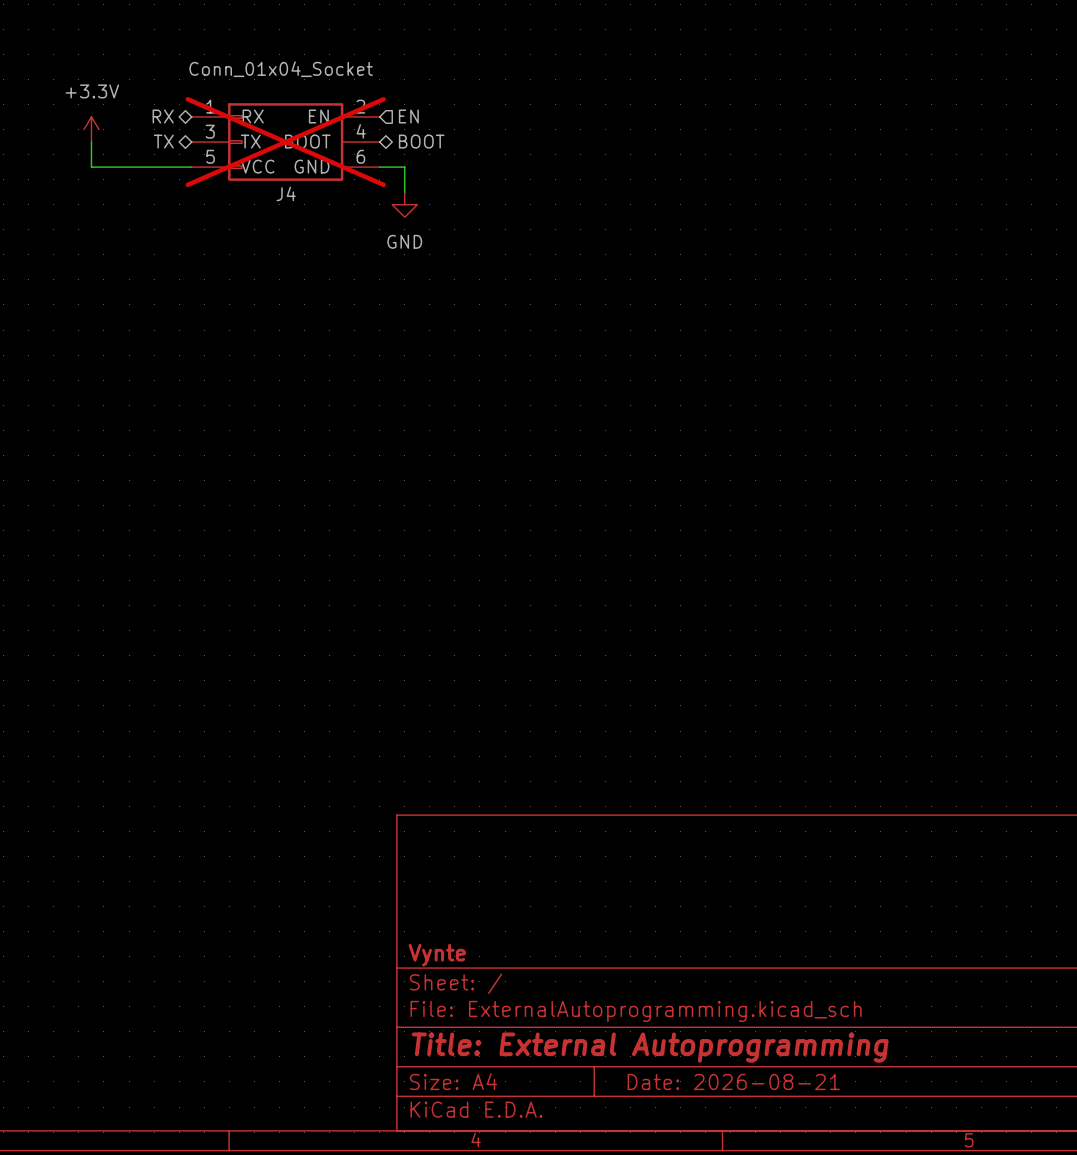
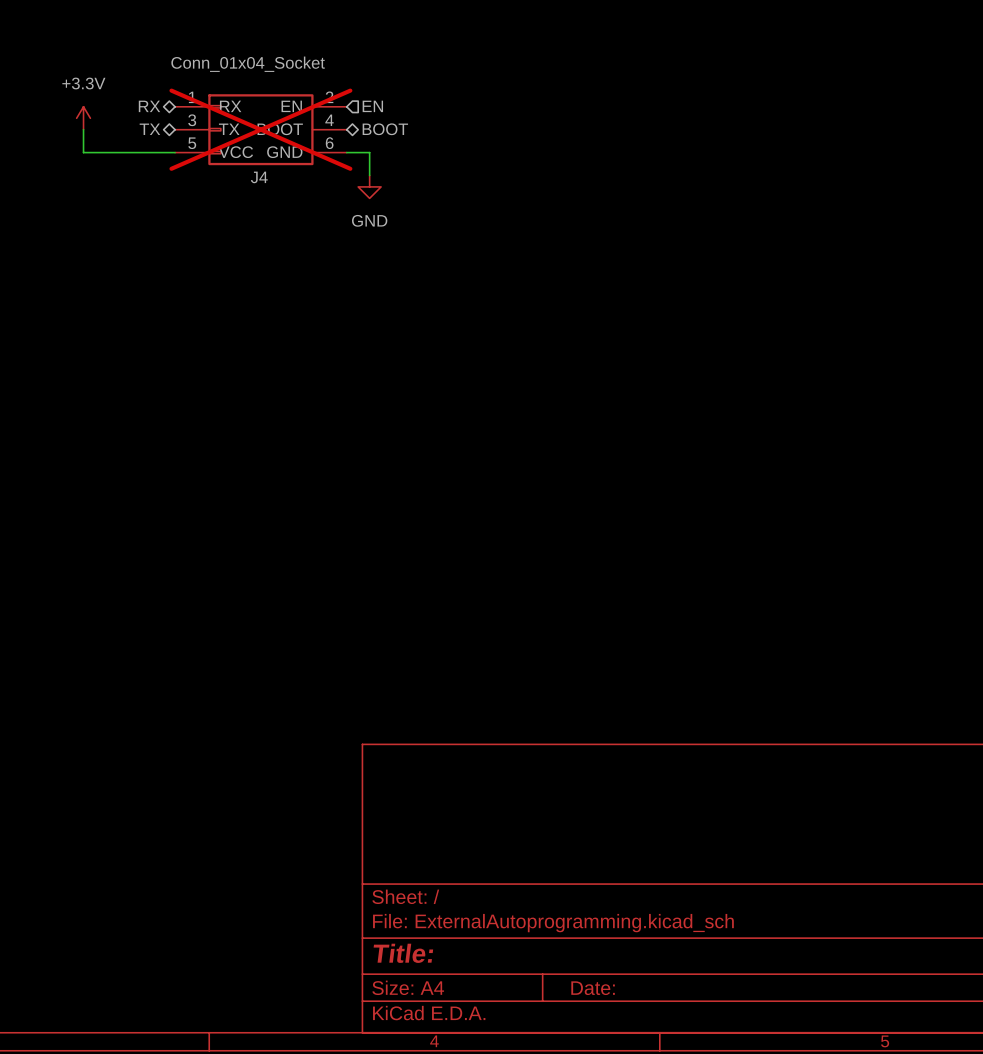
title block: Vynte (437, 955) -> none
title block: Title: External Autoprogramming (650, 1047) -> Title: (403, 953)
title block: Date: 2026-08-21 (733, 1081) -> Date: (593, 988)

